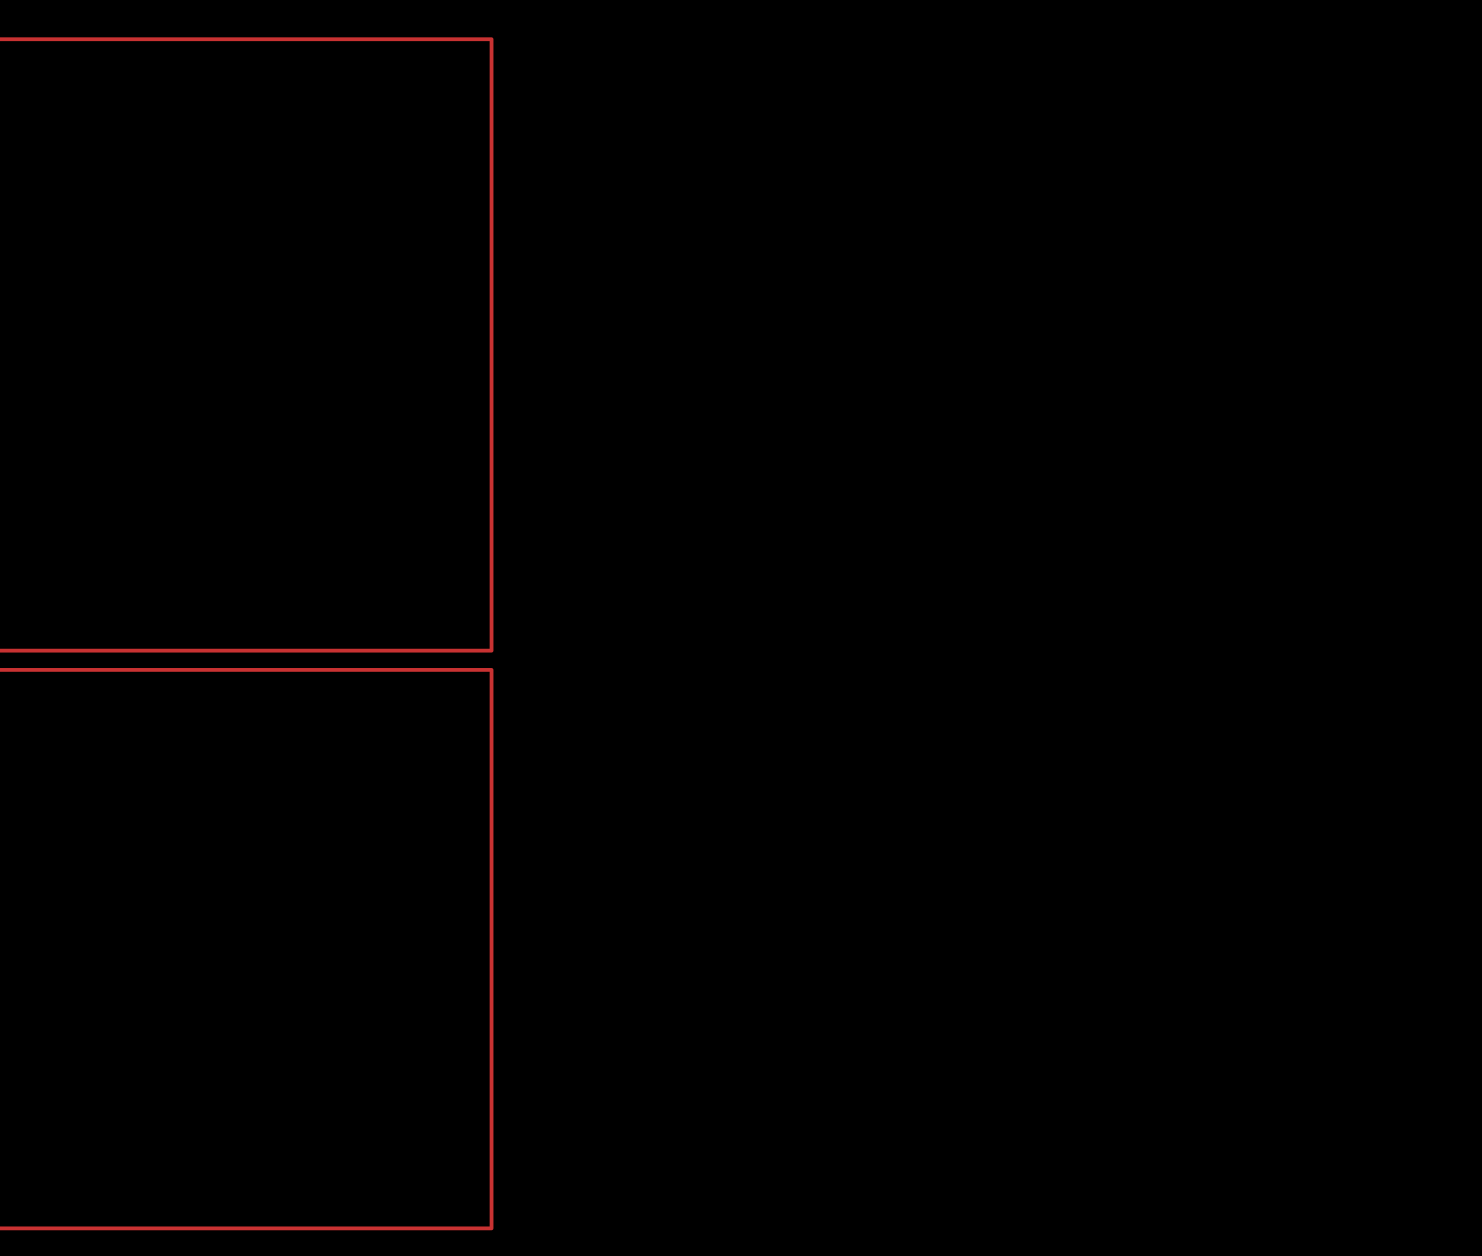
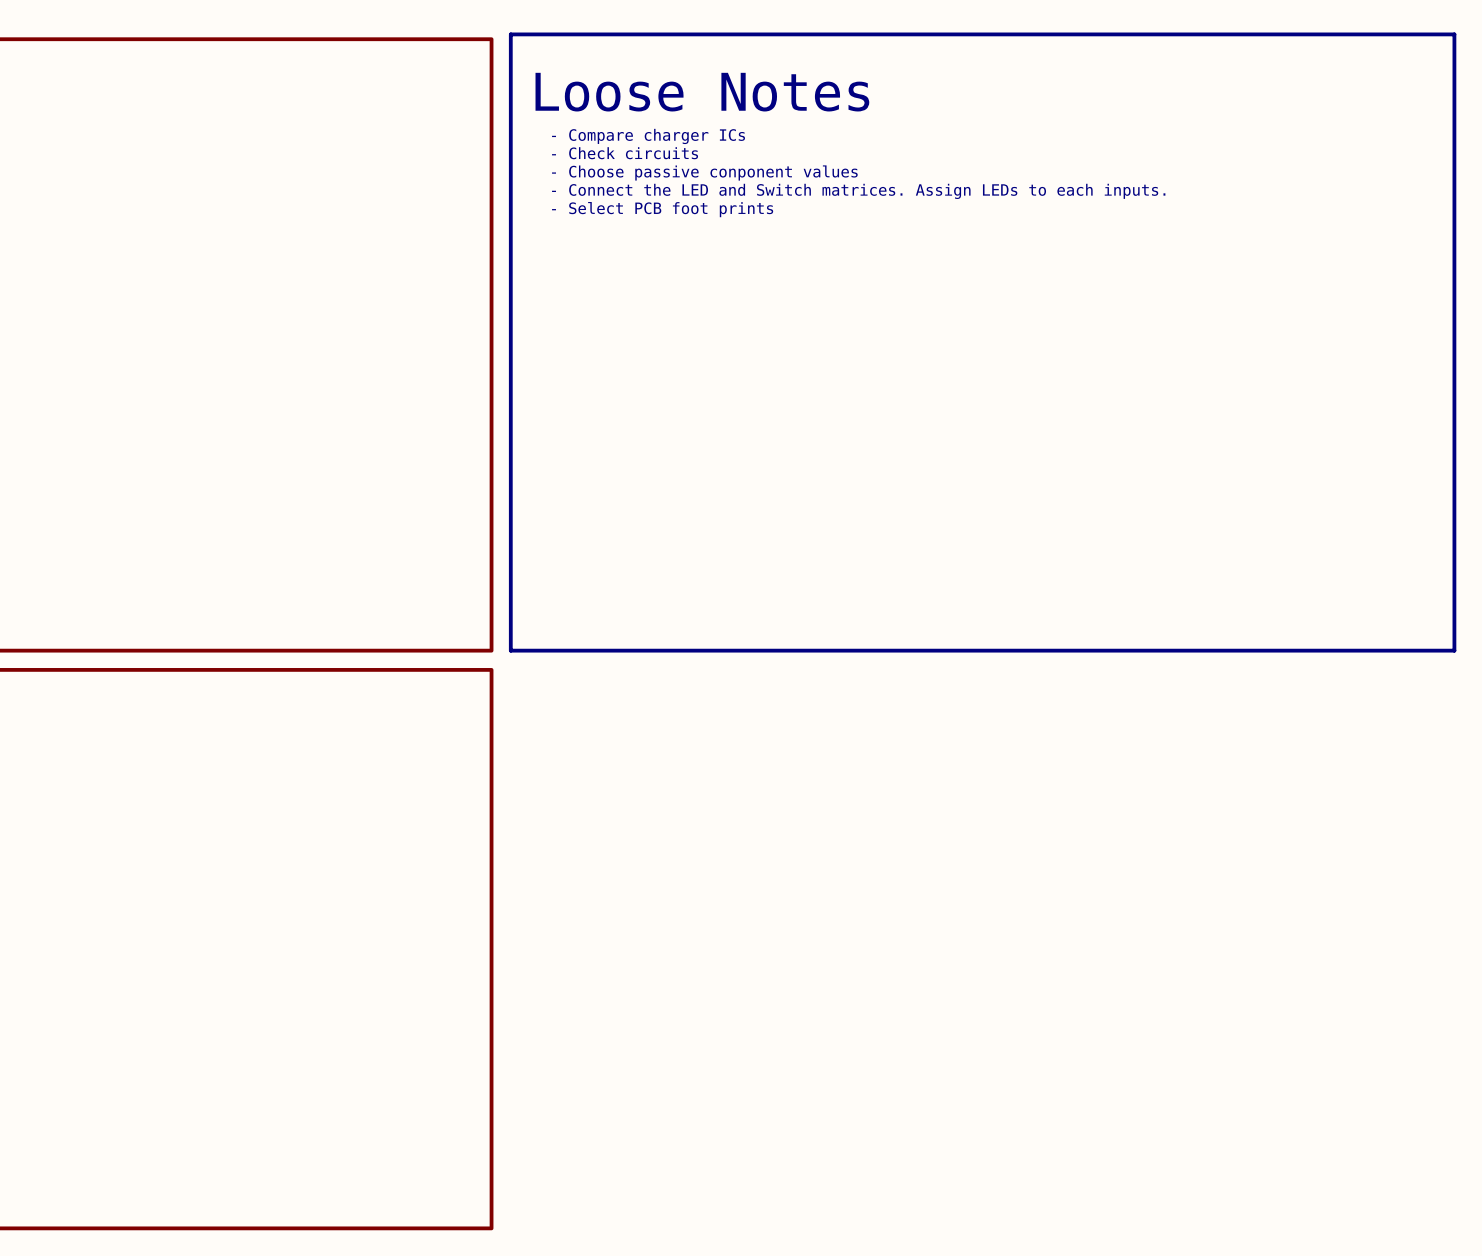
line: none -> (510, 34) (1454, 34) (1454, 650) (510, 650) (510, 34)
text: none -> Loose Notes (702, 92)
text: none -> - Compare charger ICs (648, 136)
text: none -> - Check circuits (625, 153)
text: none -> - Choose passive conponent values (704, 172)
text: none -> - Connect the LED and Switch matrices. Assign LEDs to each inputs. (858, 191)
text: none -> - Select PCB foot prints (662, 209)

